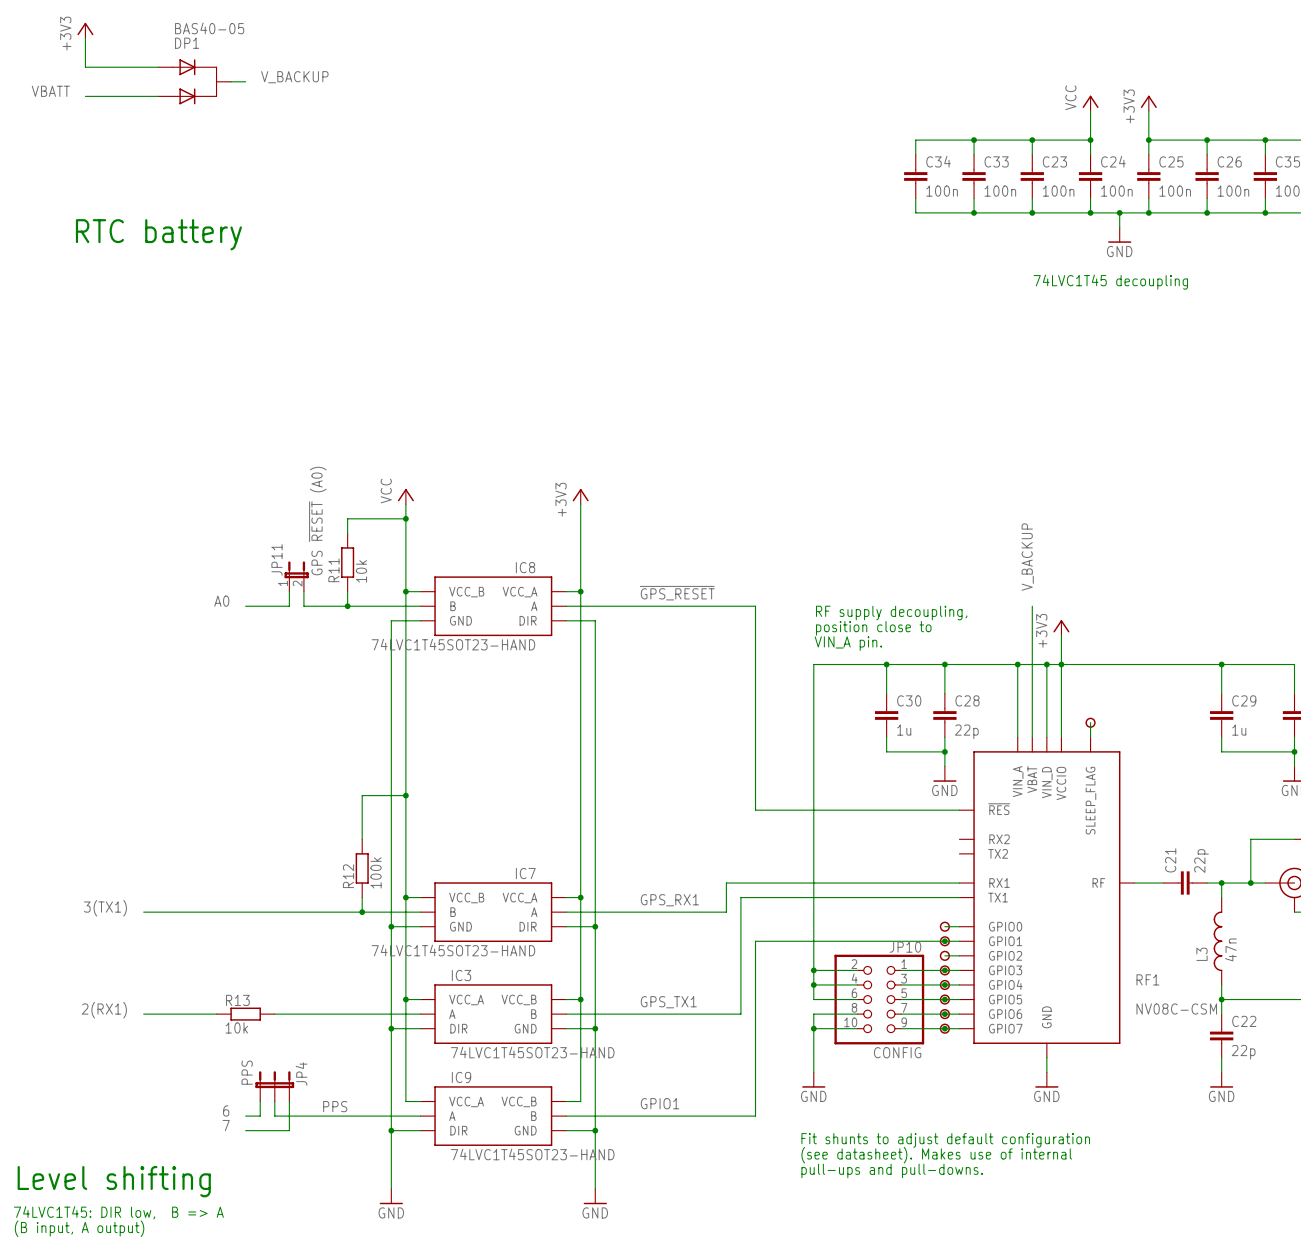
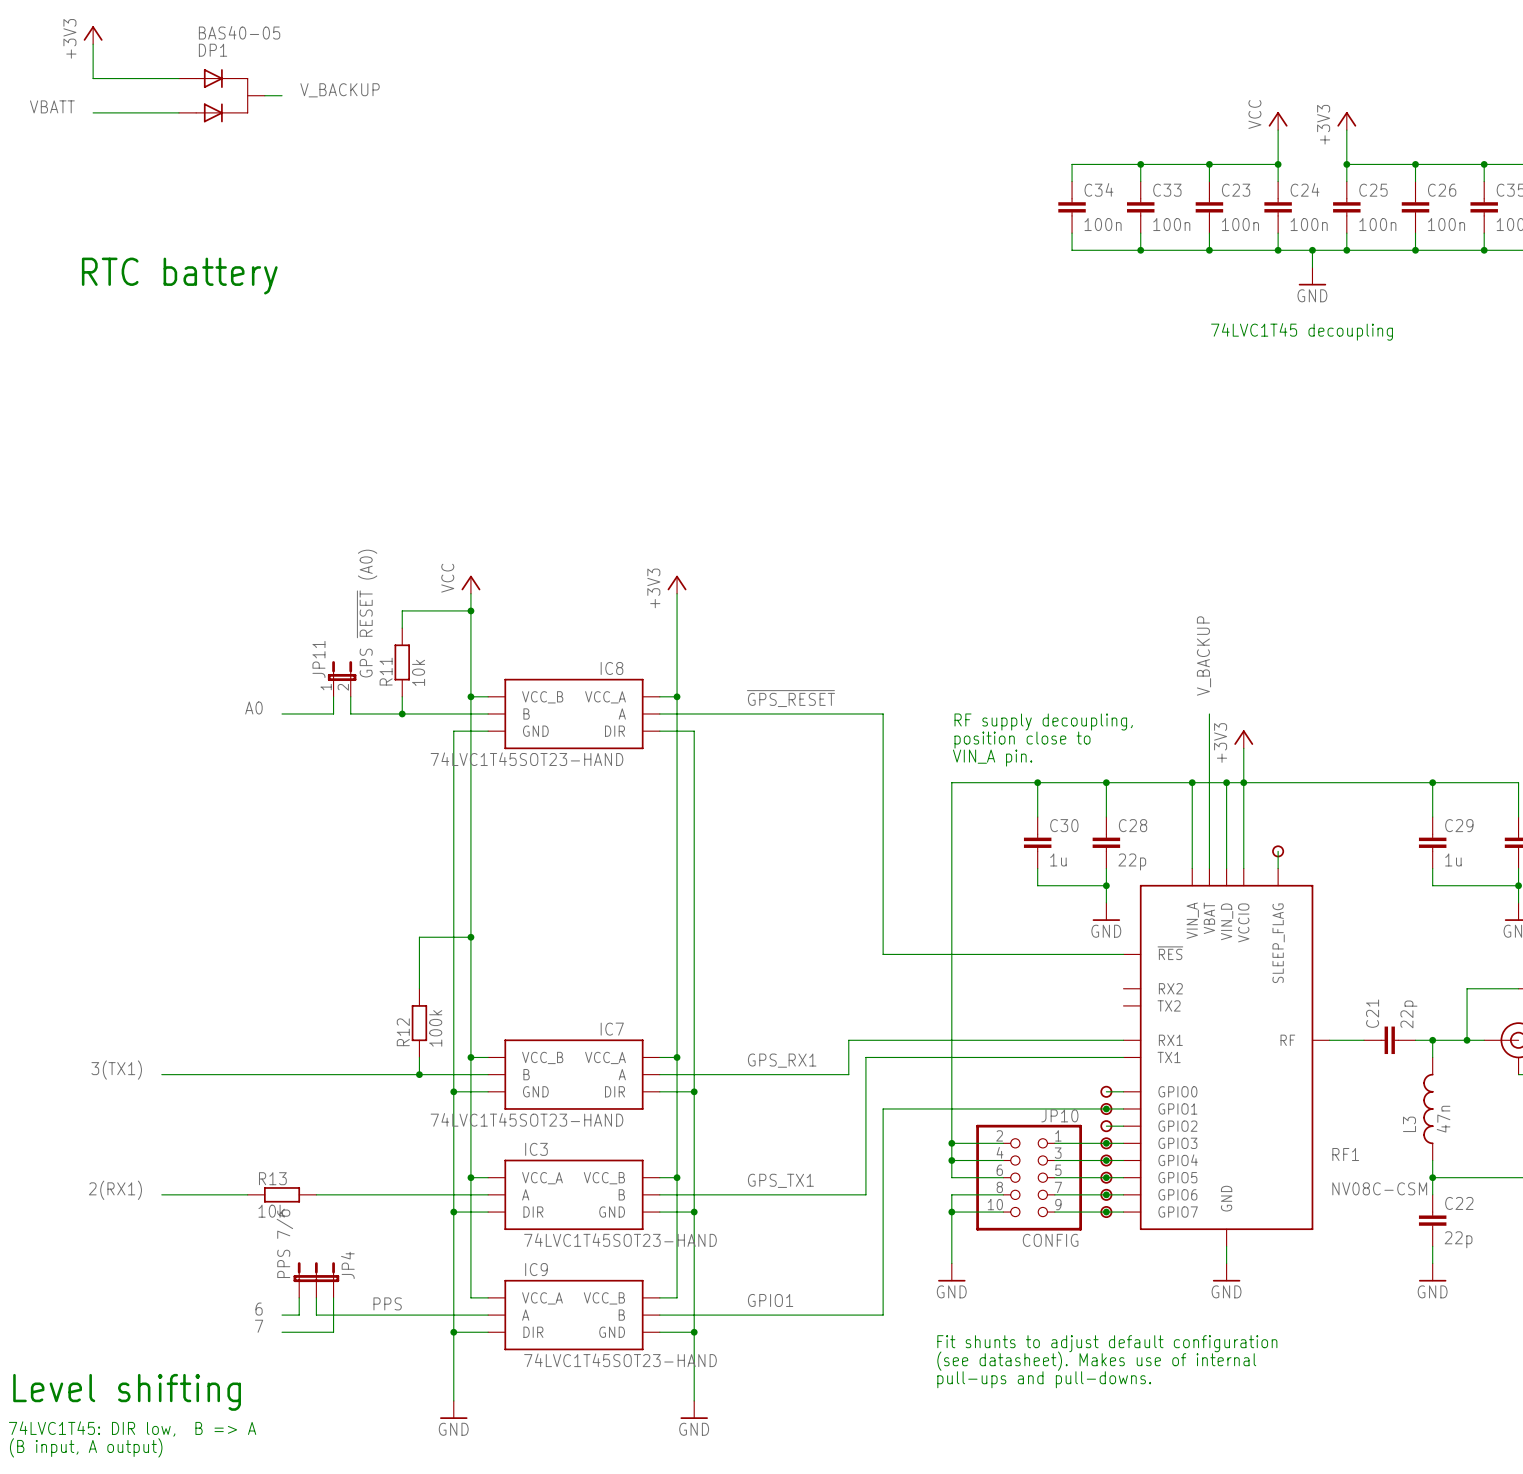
JP4 value: PPS (247, 1072) -> PPS 7/6 (284, 1243)

